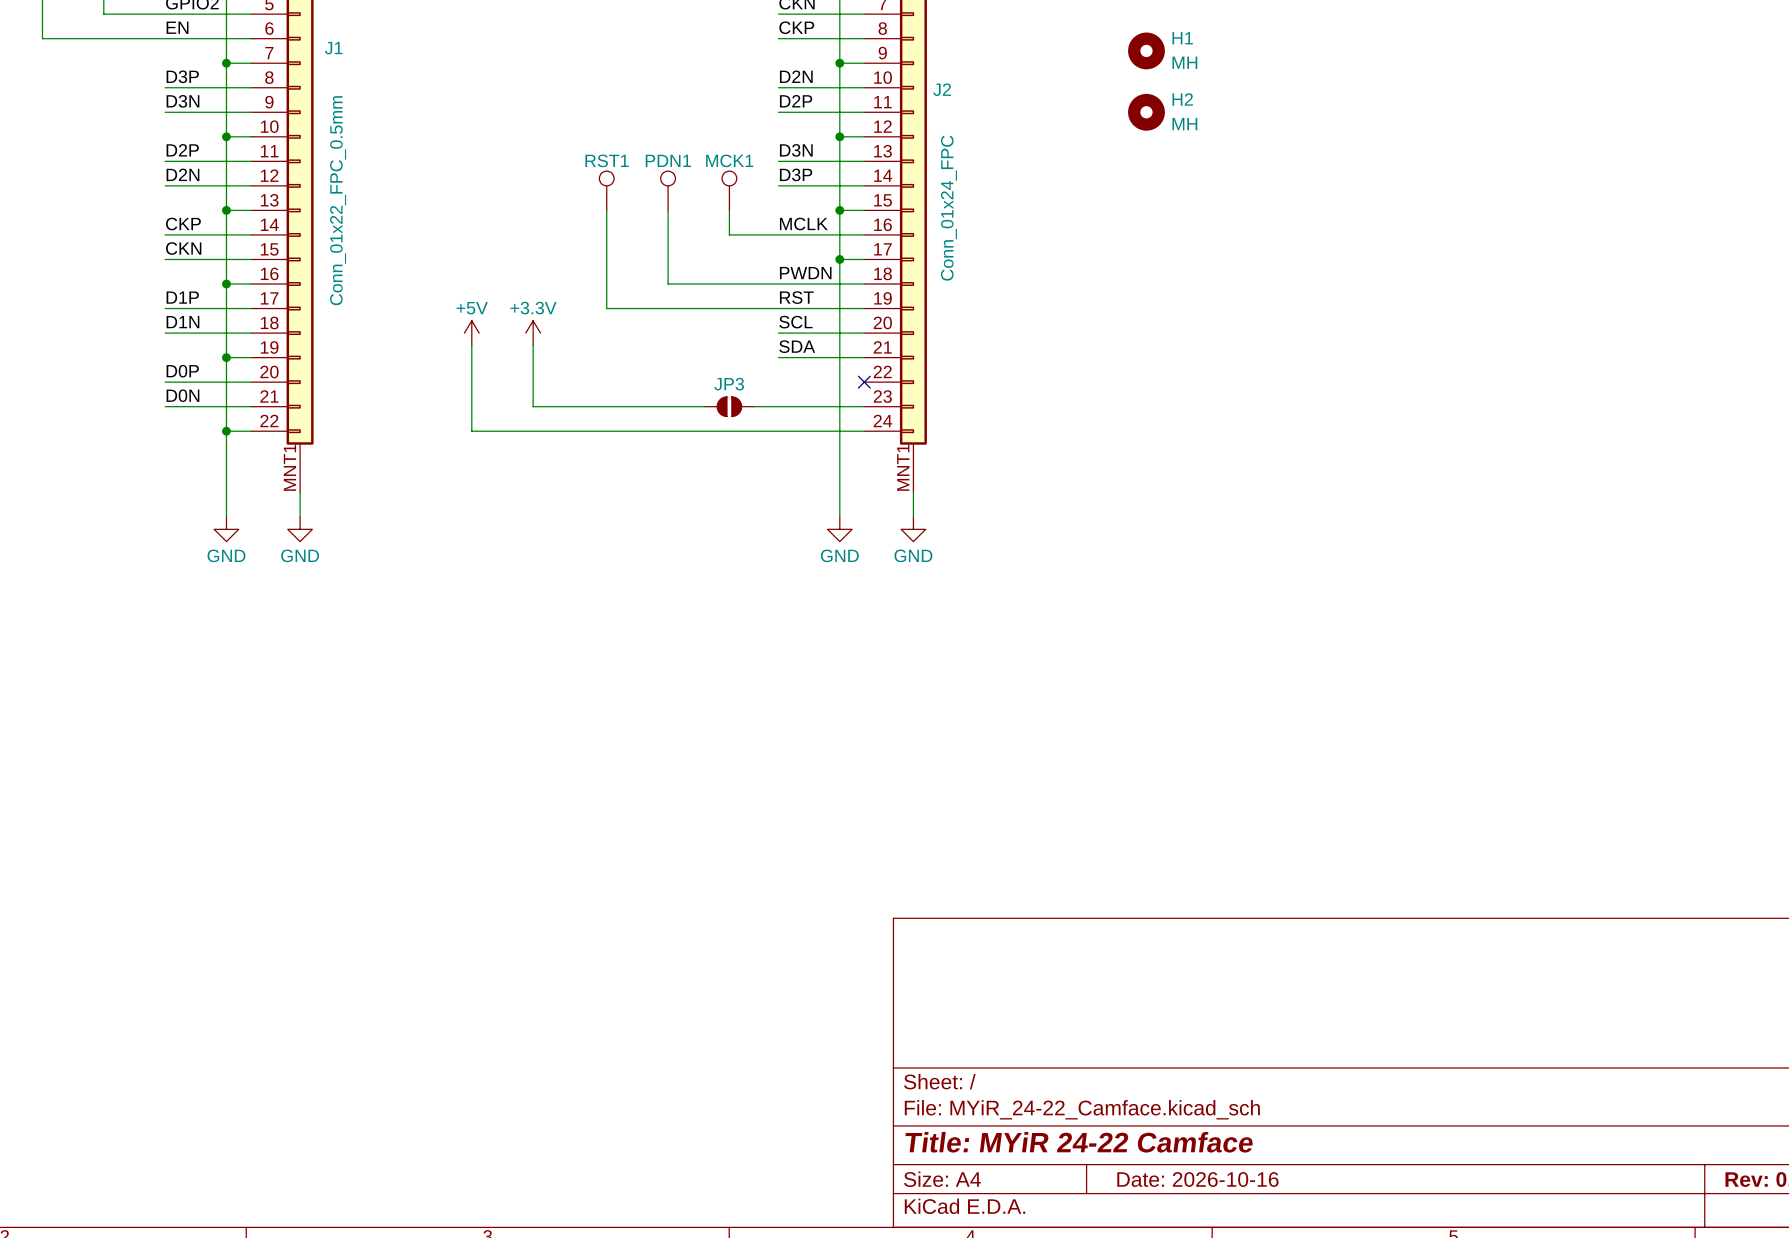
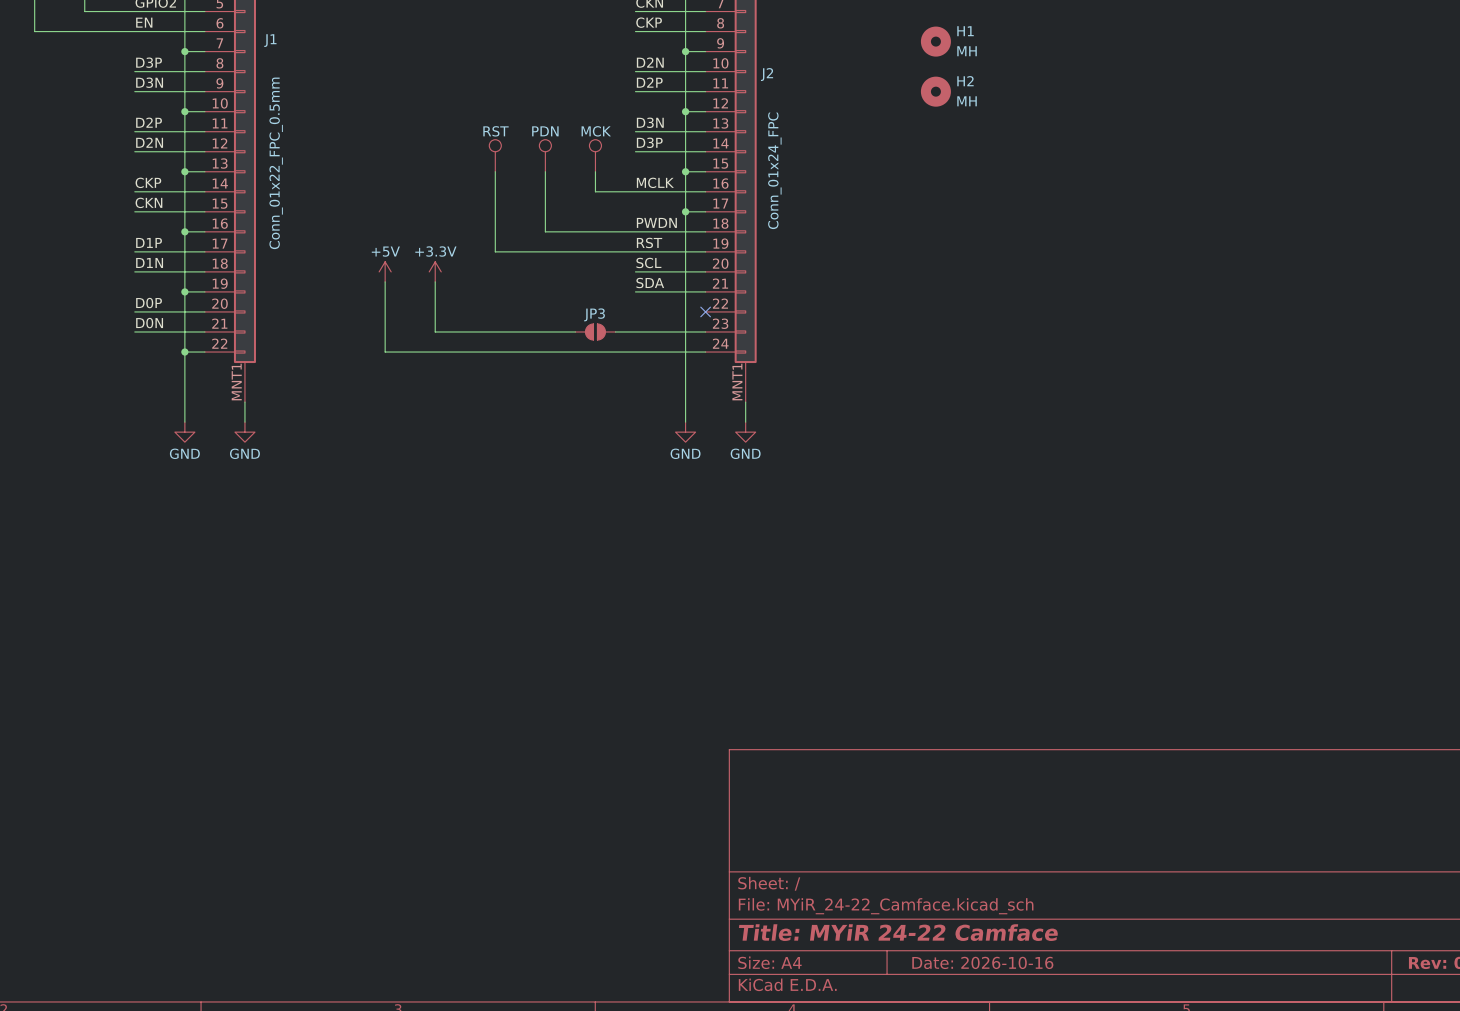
RST1 name: RST1 (607, 160) -> RST (496, 131)
PDN1 name: PDN1 (668, 160) -> PDN (545, 131)
MCK1 name: MCK1 (729, 160) -> MCK (596, 131)

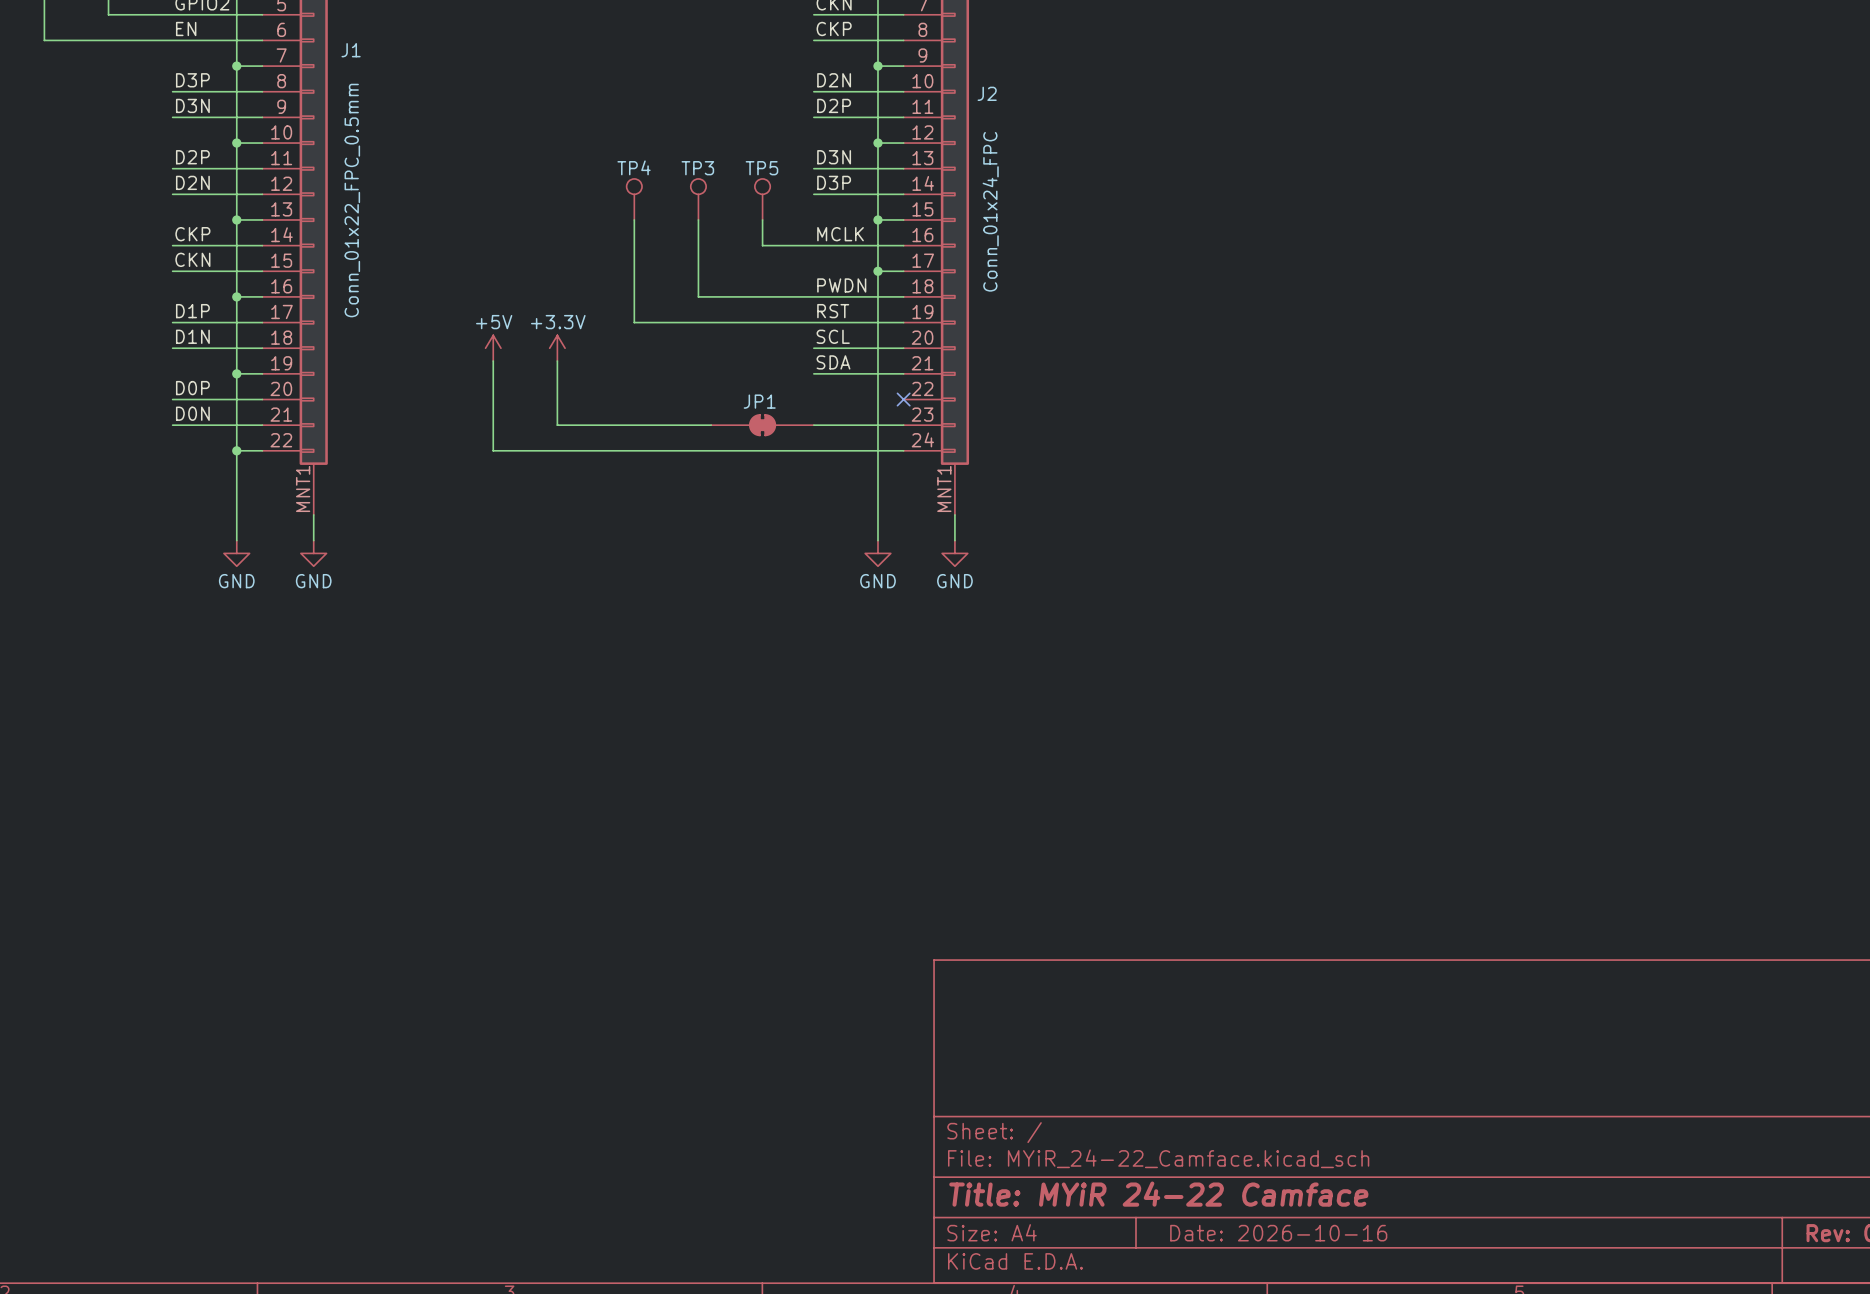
H1: MH (935, 41) -> none
H2: MH (935, 91) -> none
RST name: RST (496, 131) -> TP4 (634, 167)
PDN name: PDN (545, 131) -> TP3 (697, 168)
MCK name: MCK (596, 131) -> TP5 (761, 168)
JP3: (595, 331) -> none
JP1: none -> (762, 425)

